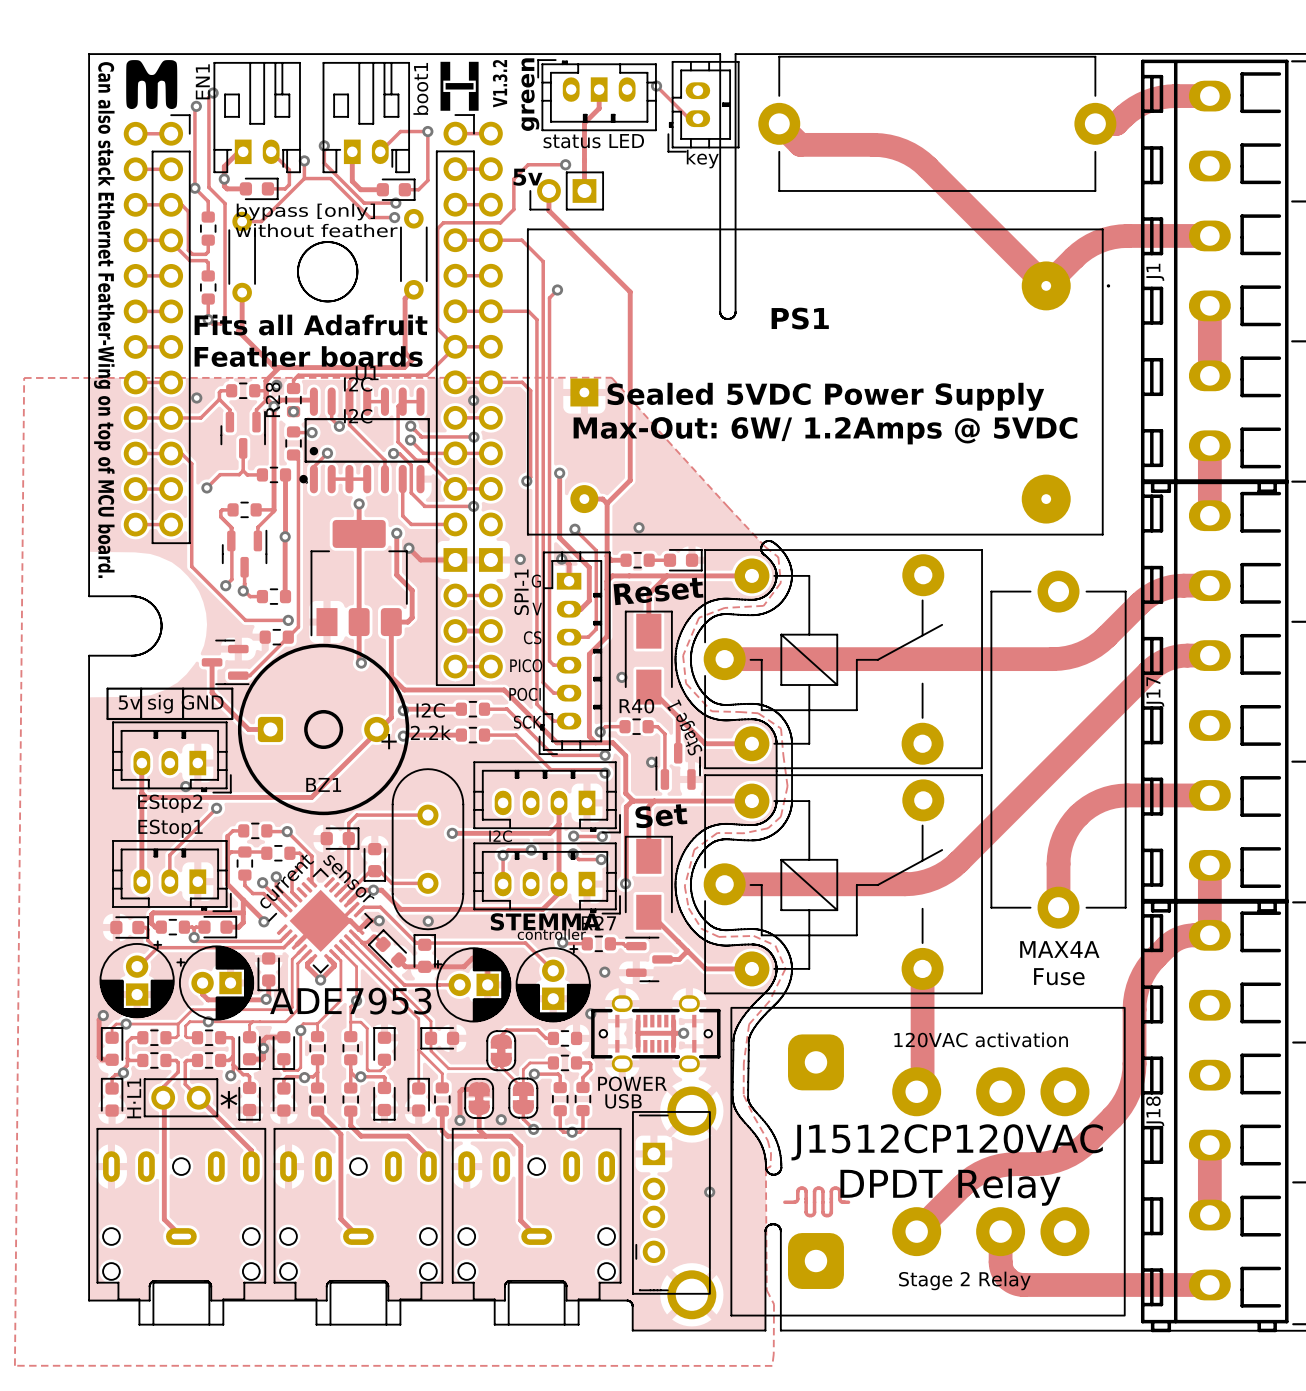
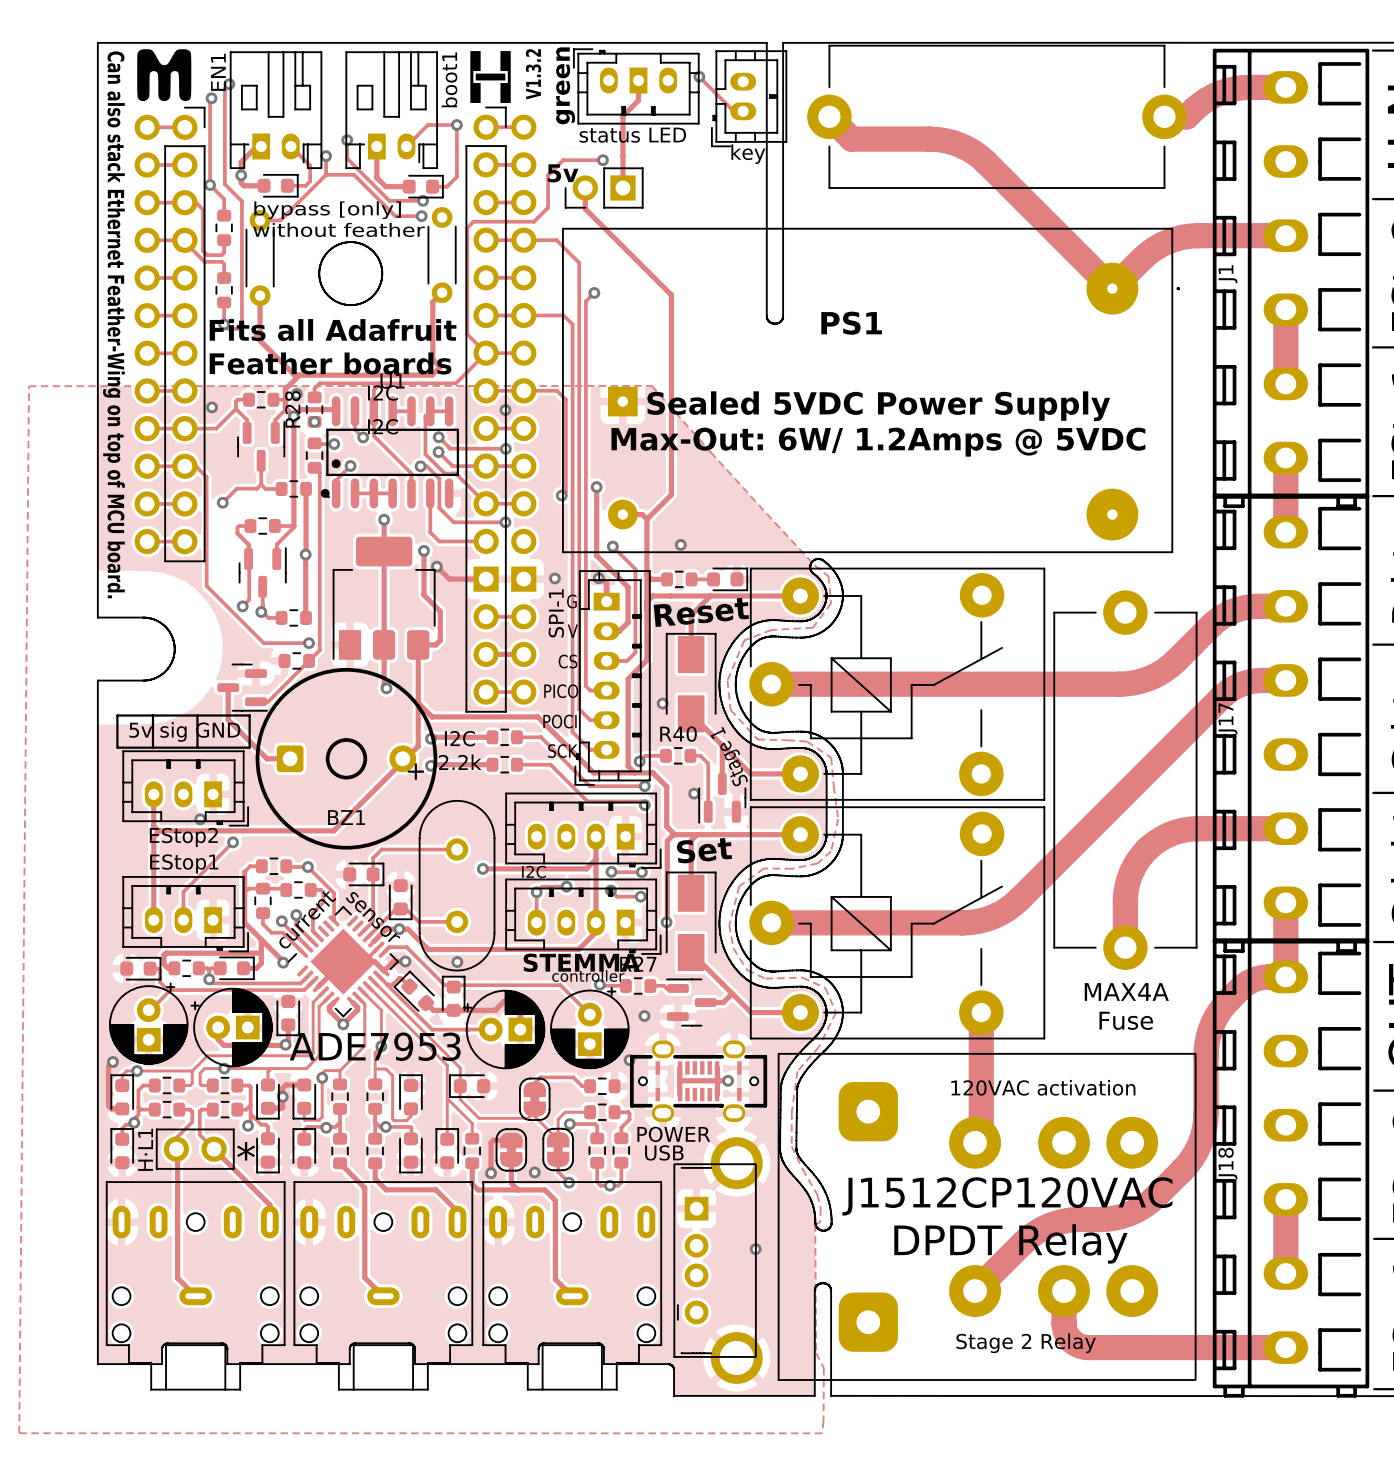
track: (784, 1202) (796, 1201) (797, 1190) (801, 1188) (806, 1190) (806, 1212) (808, 1215) (814, 1213) (814, 1191) (816, 1188) (822, 1190) (822, 1212) (824, 1215) (831, 1213) (831, 1191) (833, 1188) (839, 1189) (840, 1201) (848, 1202) -> none

